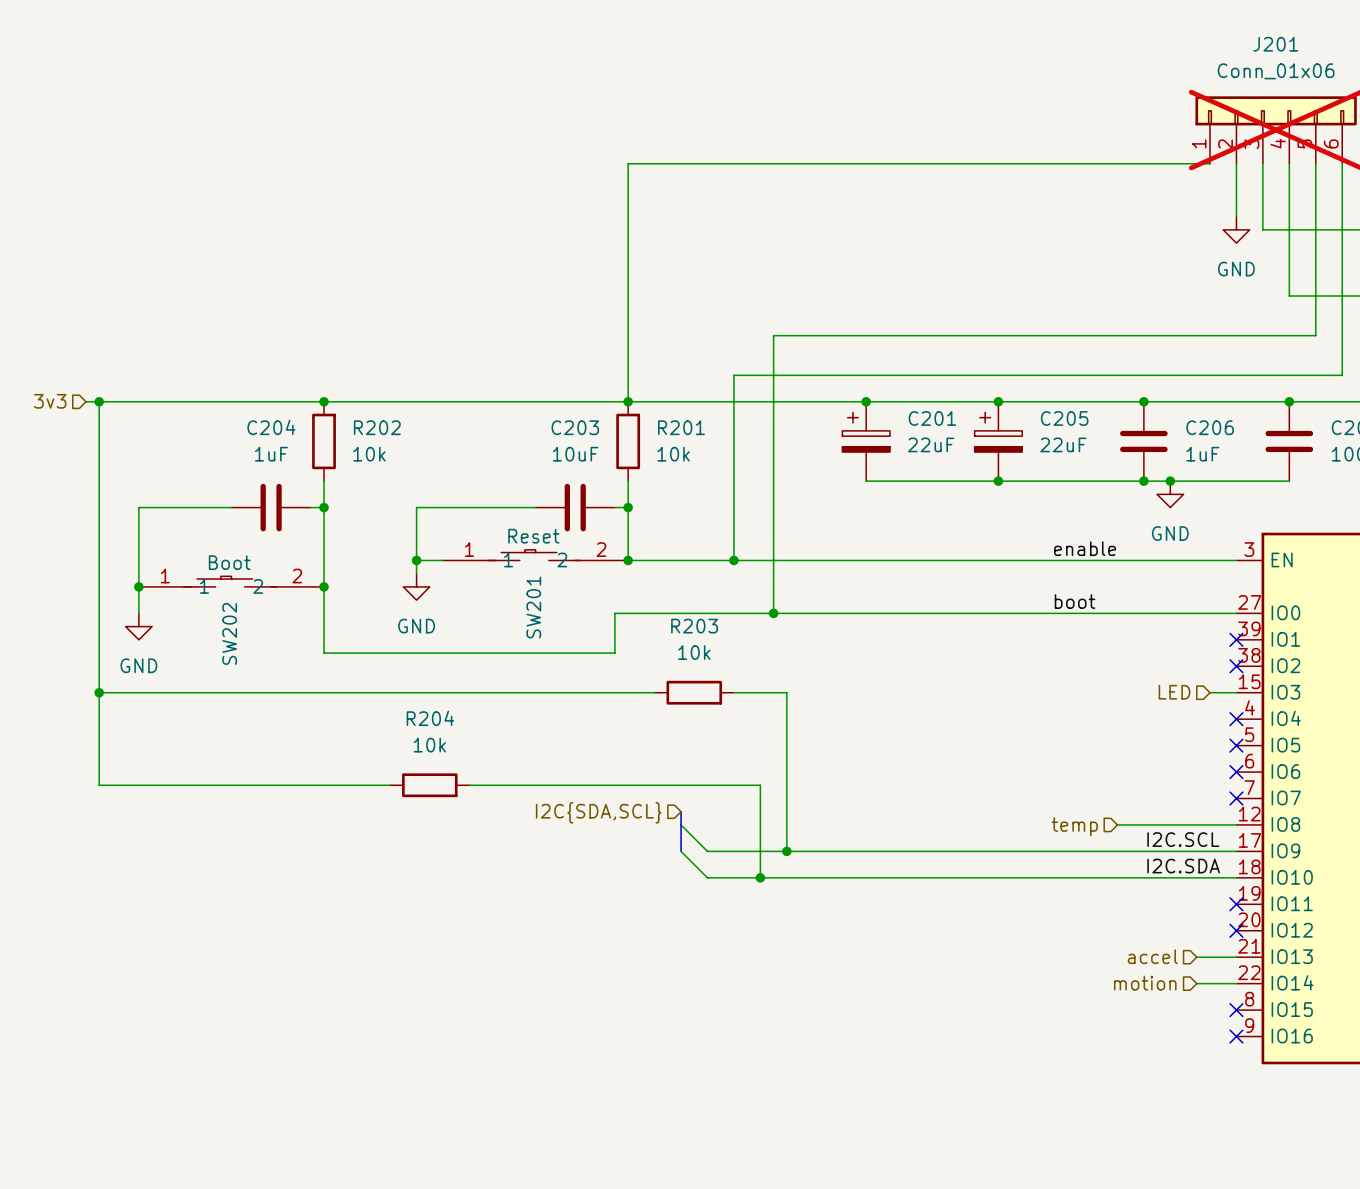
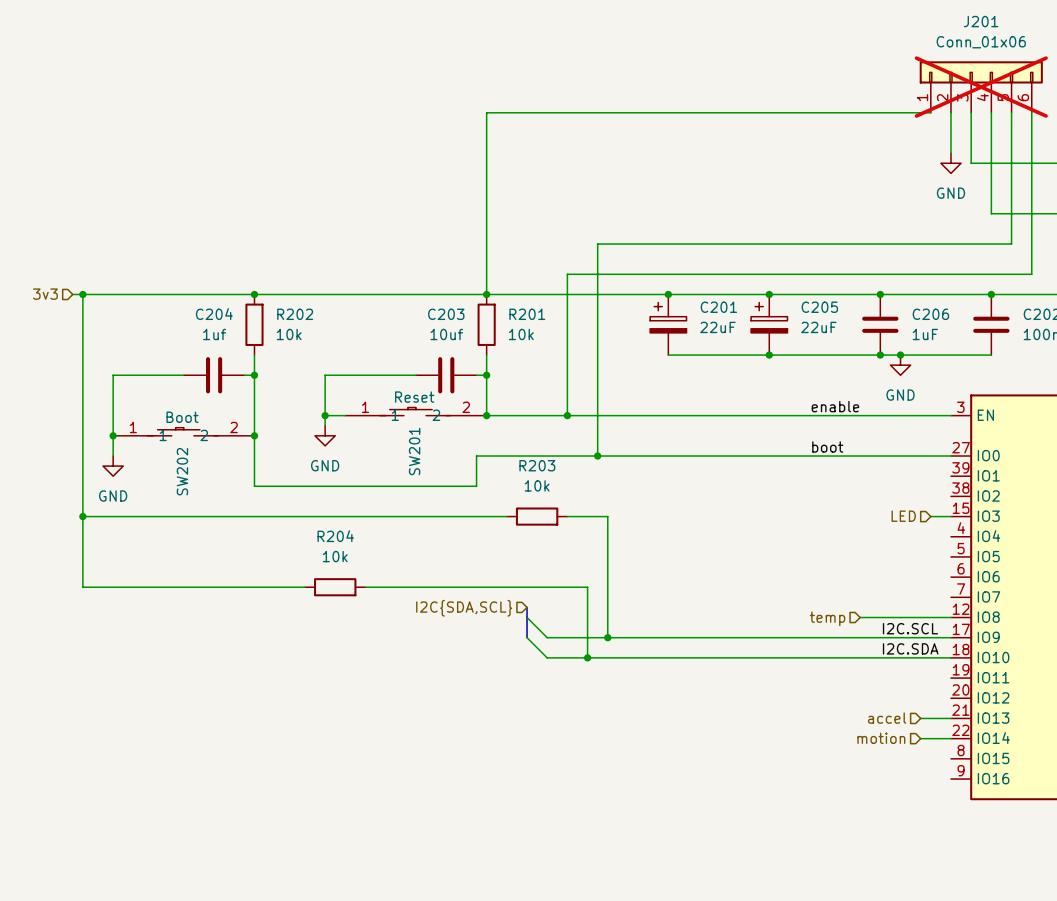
C204 value: 1uF (271, 454) -> 1uf (214, 334)
C203 value: 10uF (575, 454) -> 10uf (446, 334)
no-connect mark: (1236, 639) -> none
no-connect mark: (1236, 666) -> none
no-connect mark: (1236, 719) -> none
no-connect mark: (1236, 745) -> none
no-connect mark: (1236, 772) -> none
no-connect mark: (1236, 798) -> none
no-connect mark: (1236, 904) -> none
no-connect mark: (1236, 930) -> none
no-connect mark: (1236, 1010) -> none
no-connect mark: (1236, 1036) -> none

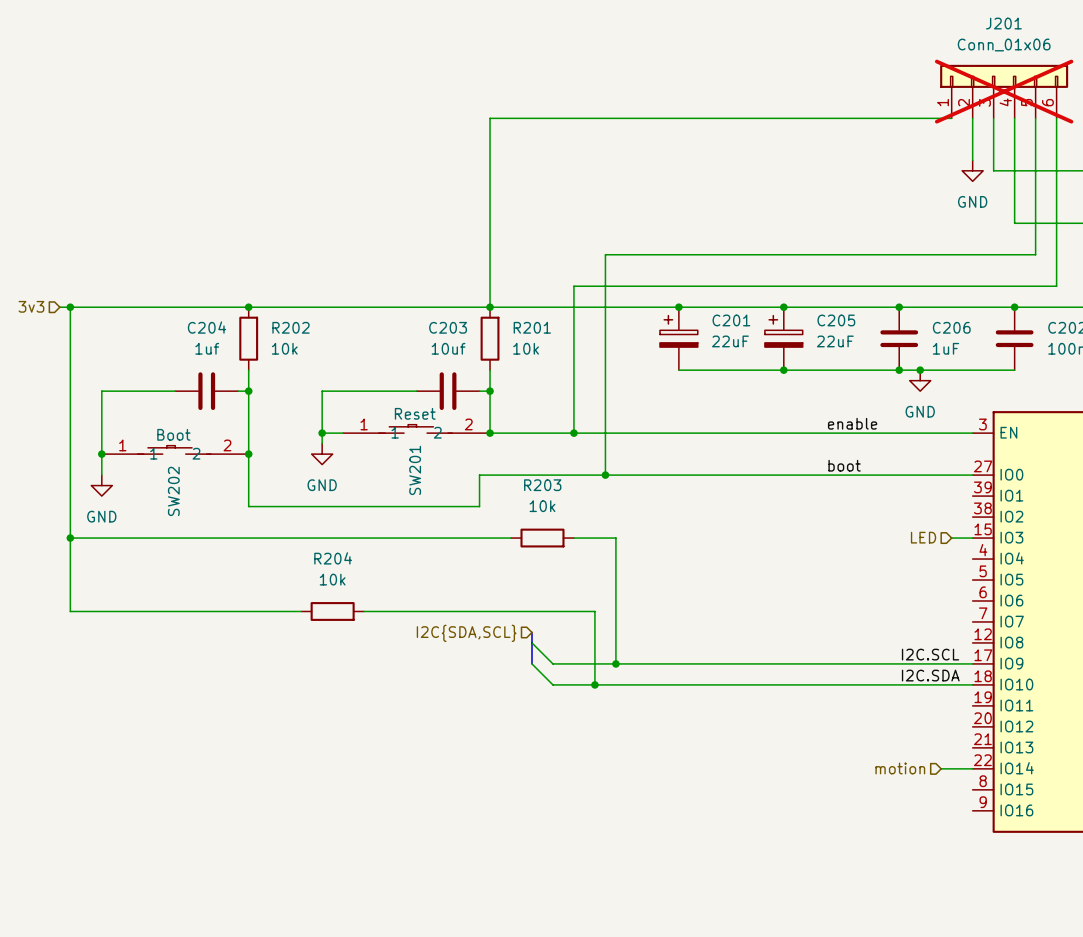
wire: (860, 617) (950, 617) -> none
hierarchical label: temp (827, 618) -> none
hierarchical label: accel (887, 718) -> none
wire: (920, 718) (950, 718) -> none

